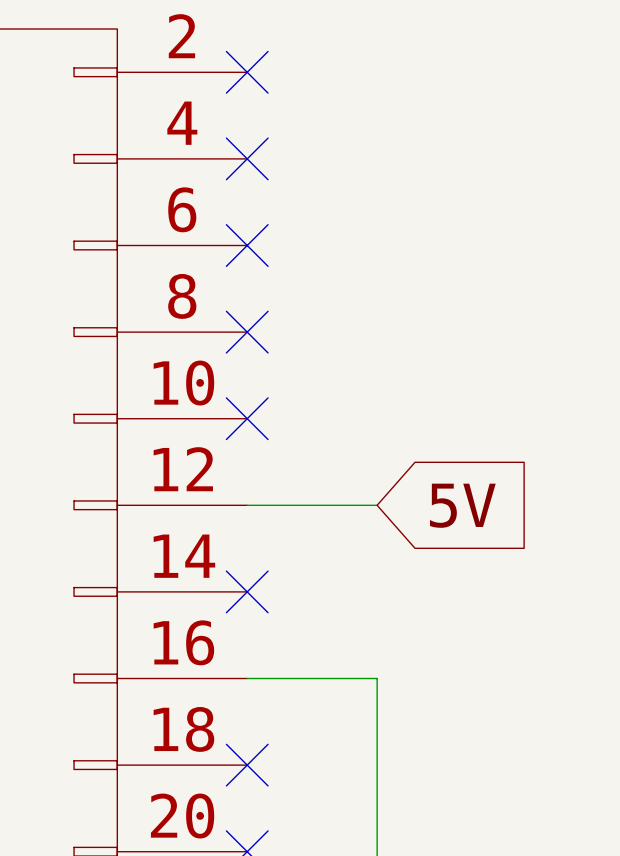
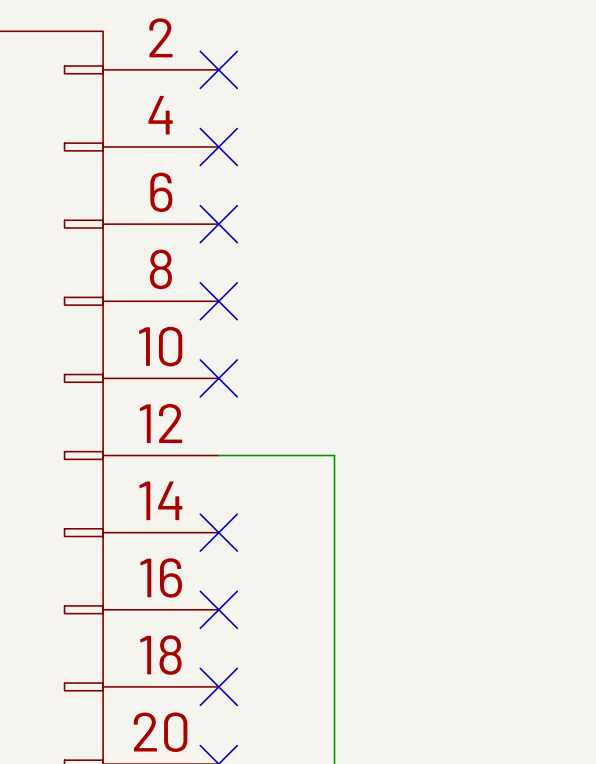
global label: 5V (462, 505) -> none
wire: (247, 678) (377, 678) -> (334, 455) (334, 609)
no-connect mark: none -> (218, 609)

